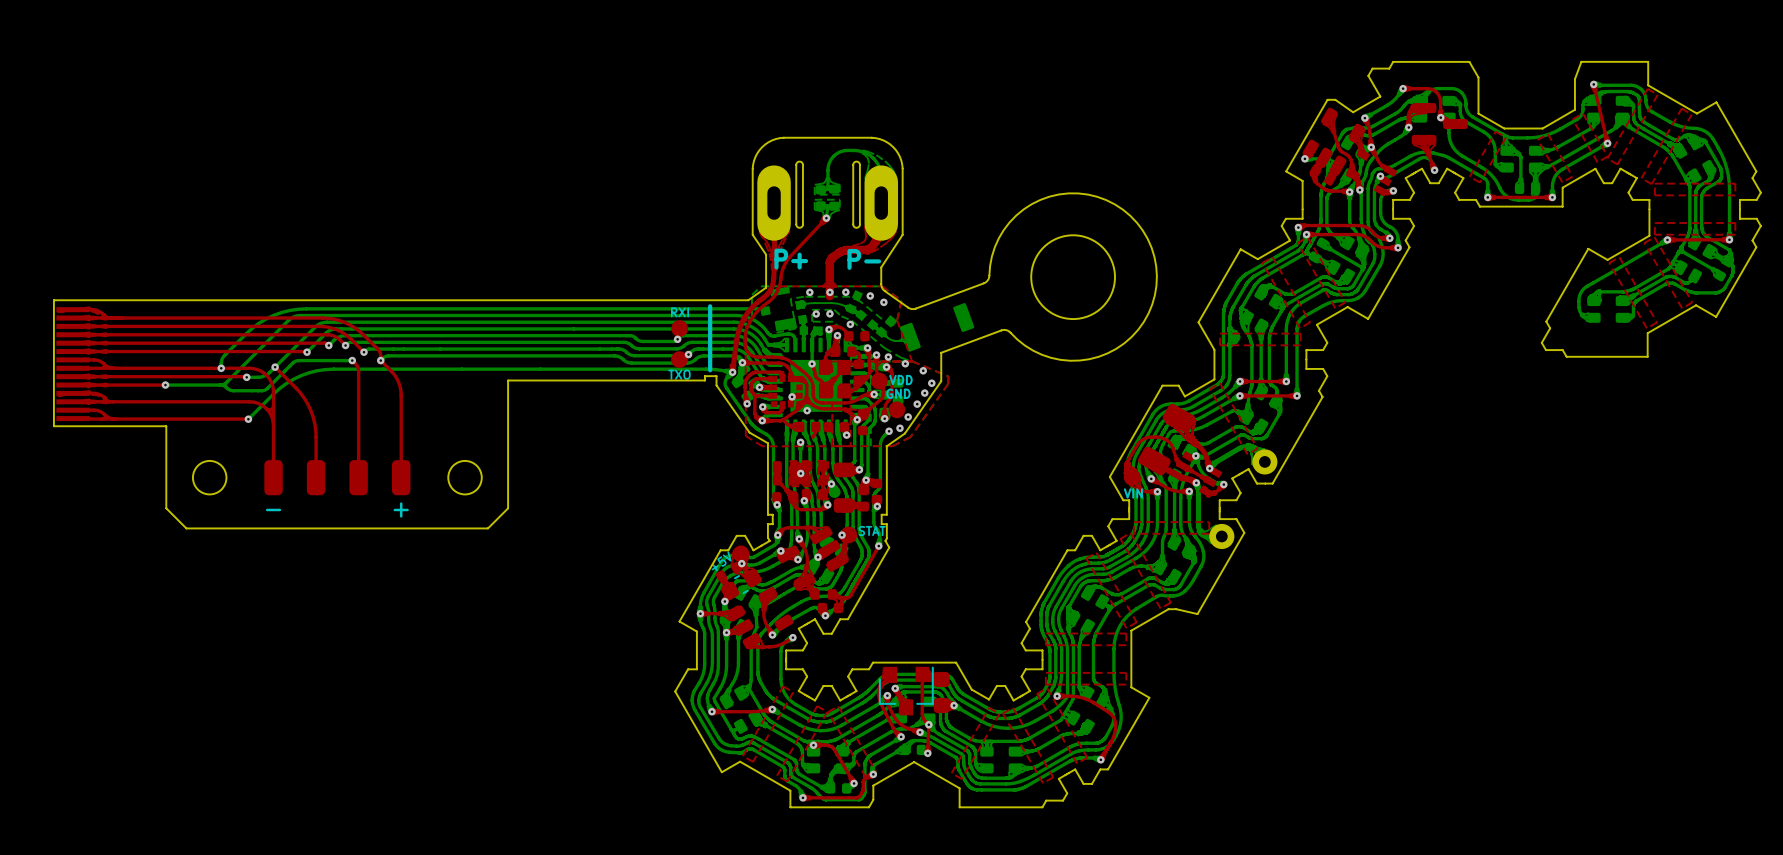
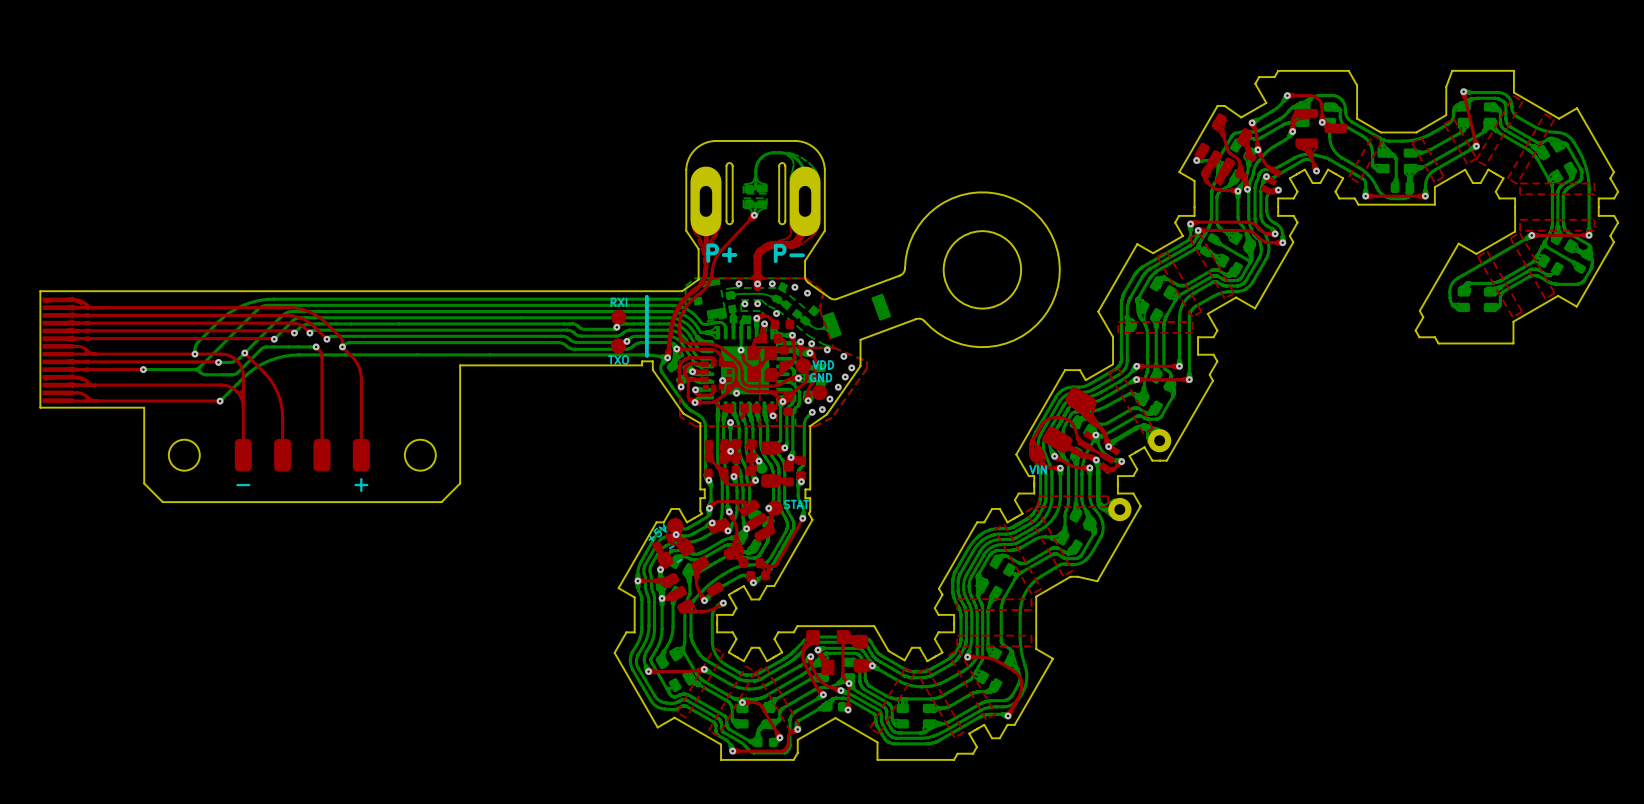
part footprint: [878, 666, 934, 716] -> [807, 630, 850, 675]

